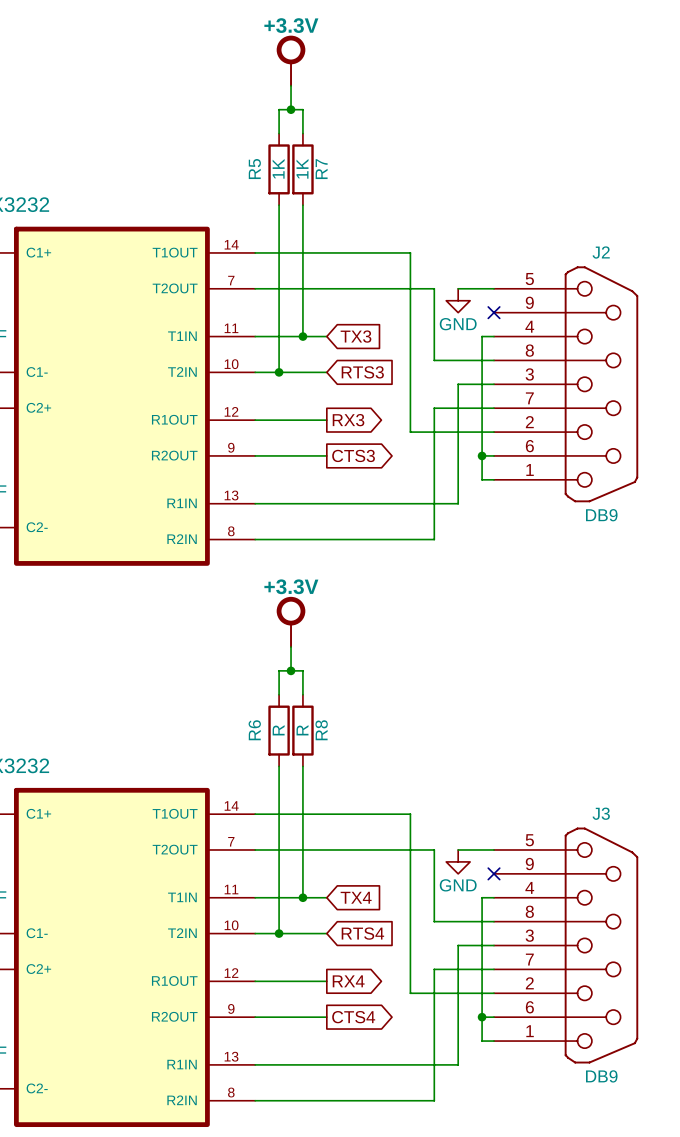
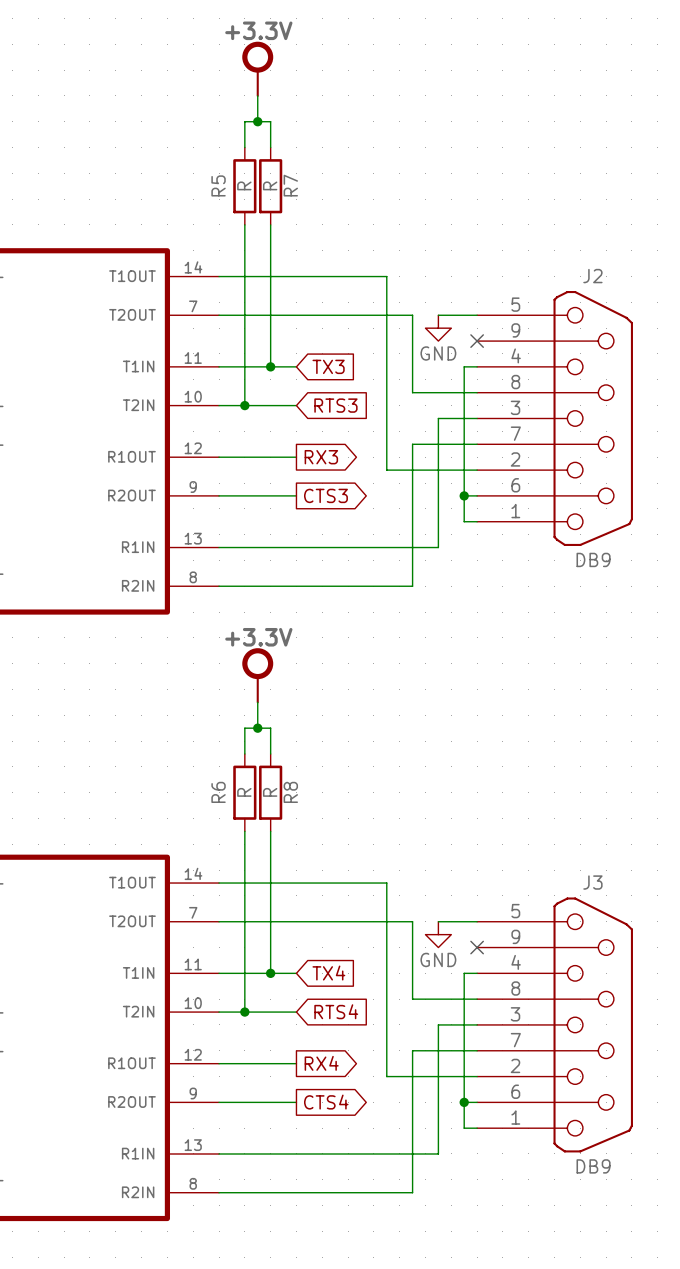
R5 value: 1K (278, 168) -> R (244, 185)
R7 value: 1K (302, 168) -> R (270, 185)

